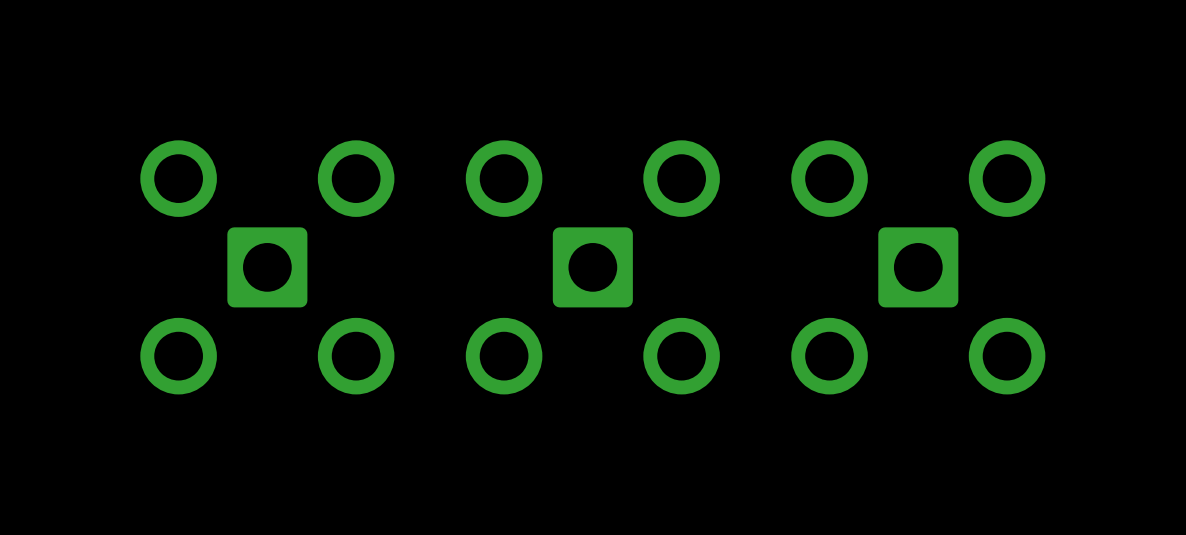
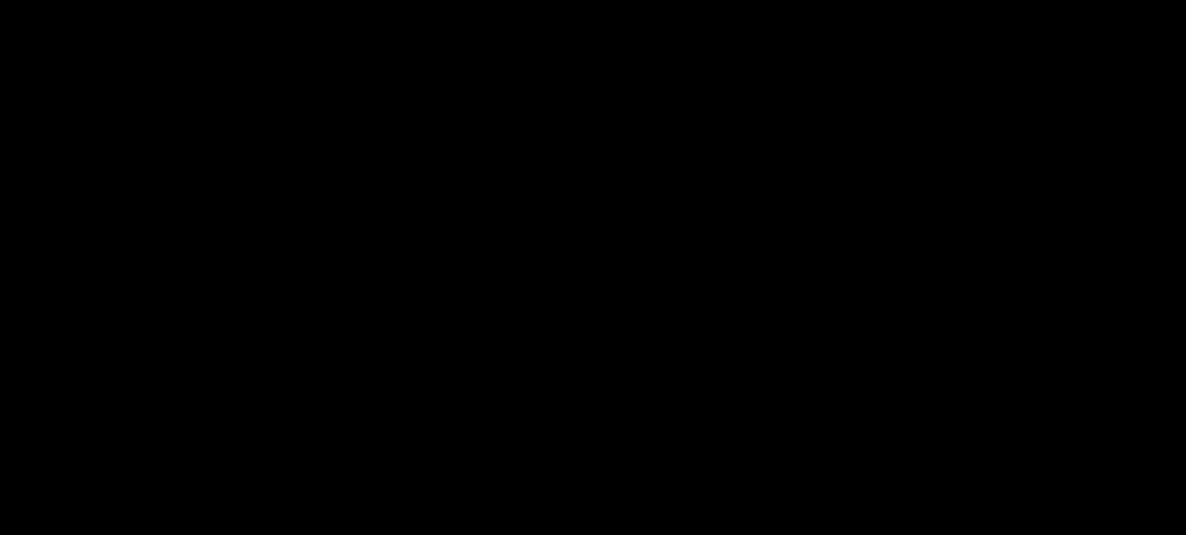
part: (267, 267) -> none
part: (592, 267) -> none
part: (918, 267) -> none

